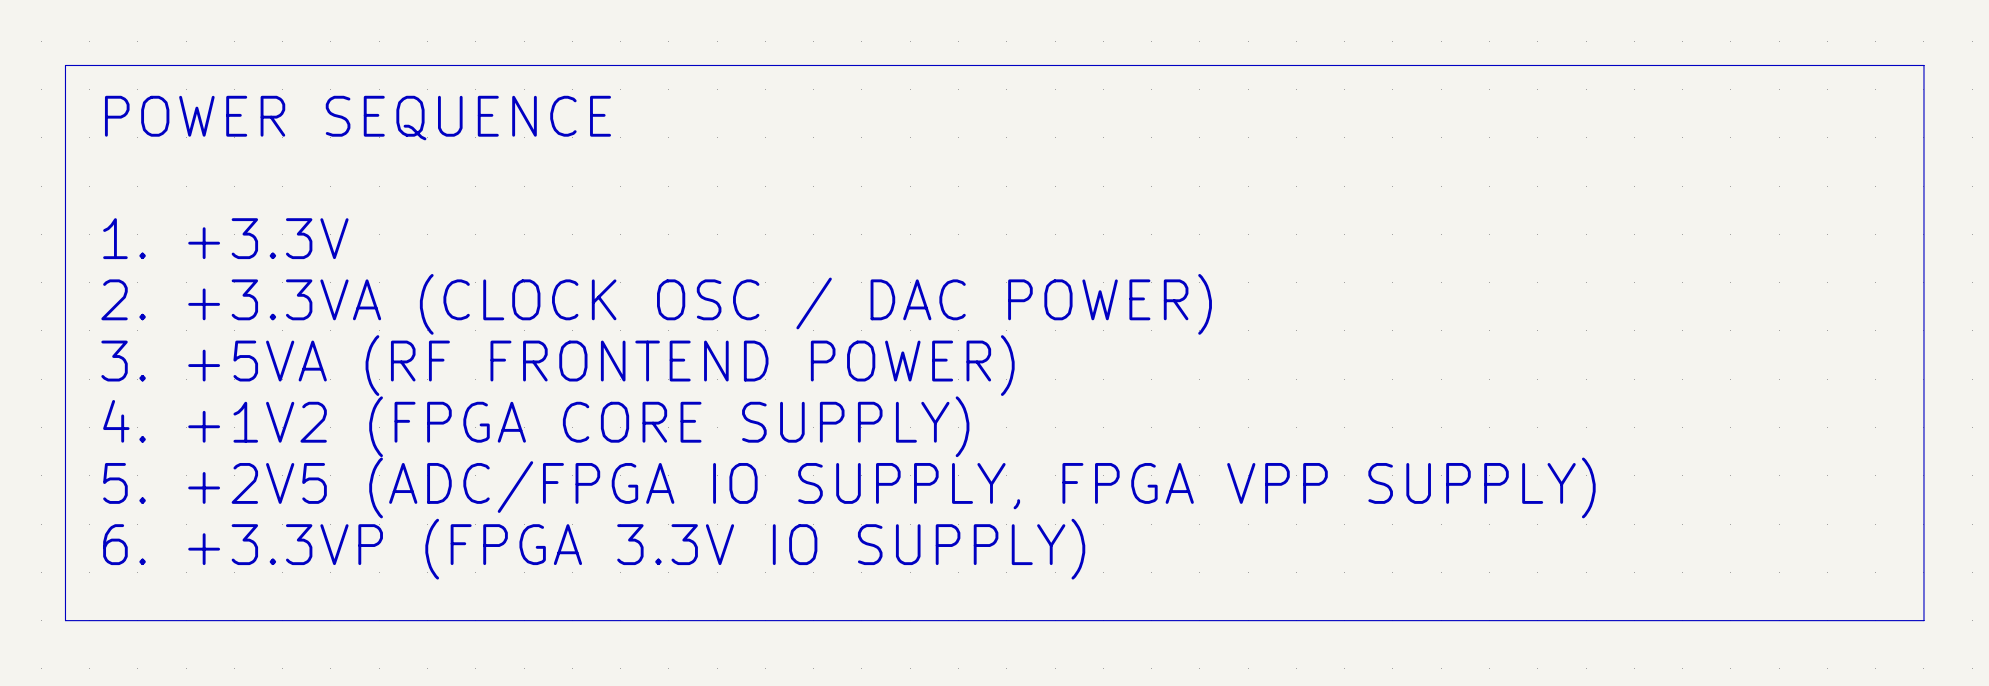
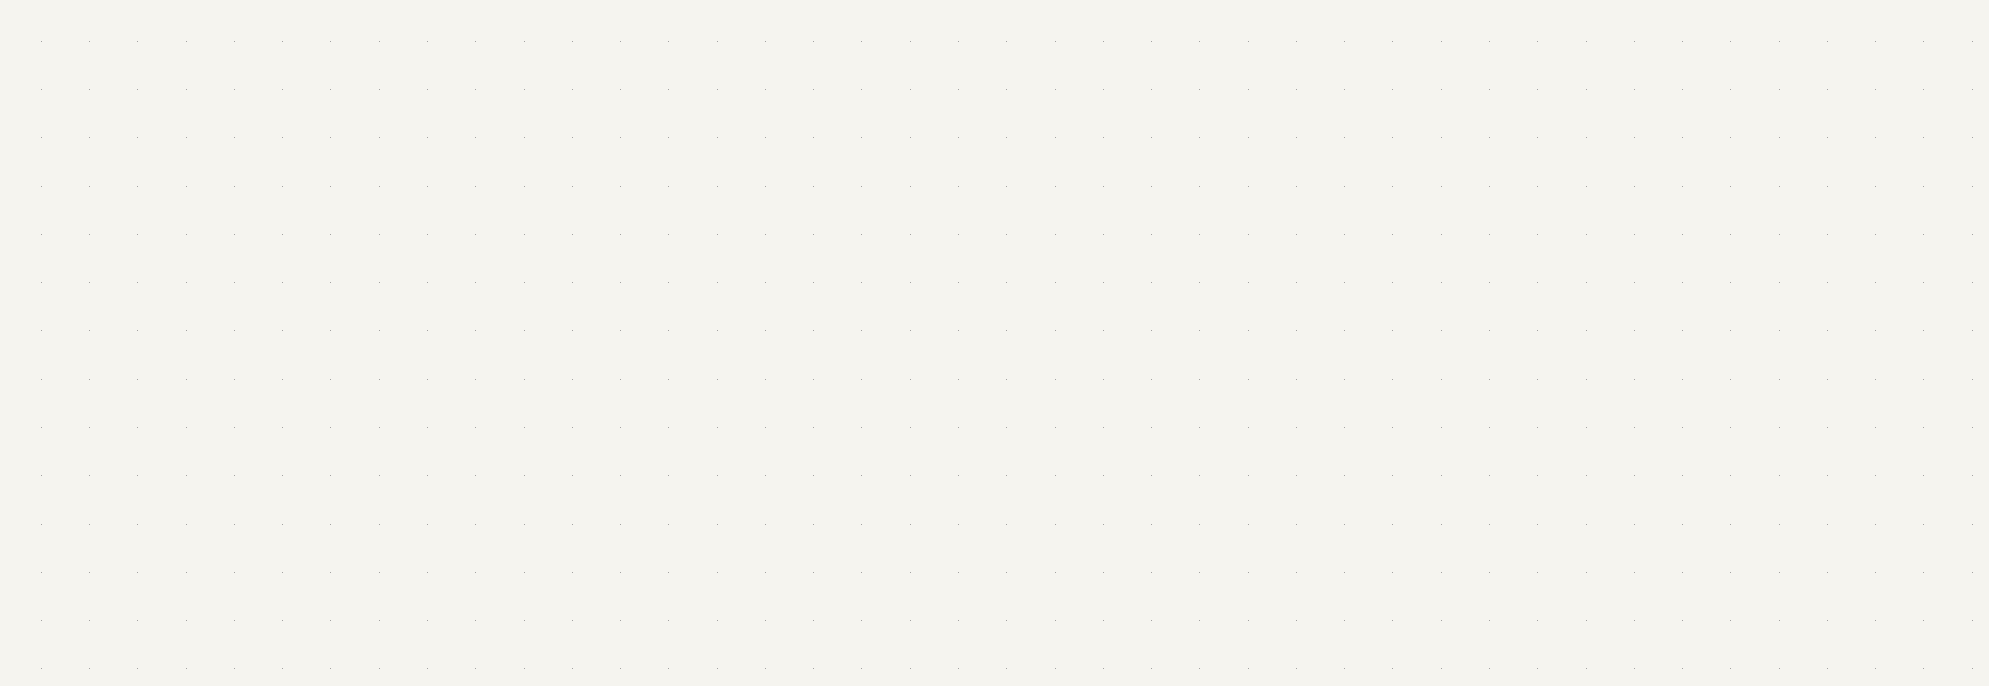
line: (65, 65) (1923, 65) (1923, 620) (65, 620) (65, 65) -> none
text: POWER SEQUENCE (357, 118) -> none
text: 1. +3.3V (225, 238) -> none
text: 2. +3.3VA (CLOCK OSC / DAC POWER) (656, 304) -> none
text: 3. +5VA (RF FRONTEND POWER) (557, 365) -> none
text: 4. +1V2 (FPGA CORE SUPPLY) (536, 426) -> none
text: 5. +2V5 (ADC/FPGA IO SUPPLY, FPGA VPP SUPPLY) (849, 487) -> none
text: 6. +3.3VP (FPGA 3.3V IO SUPPLY) (594, 549) -> none

